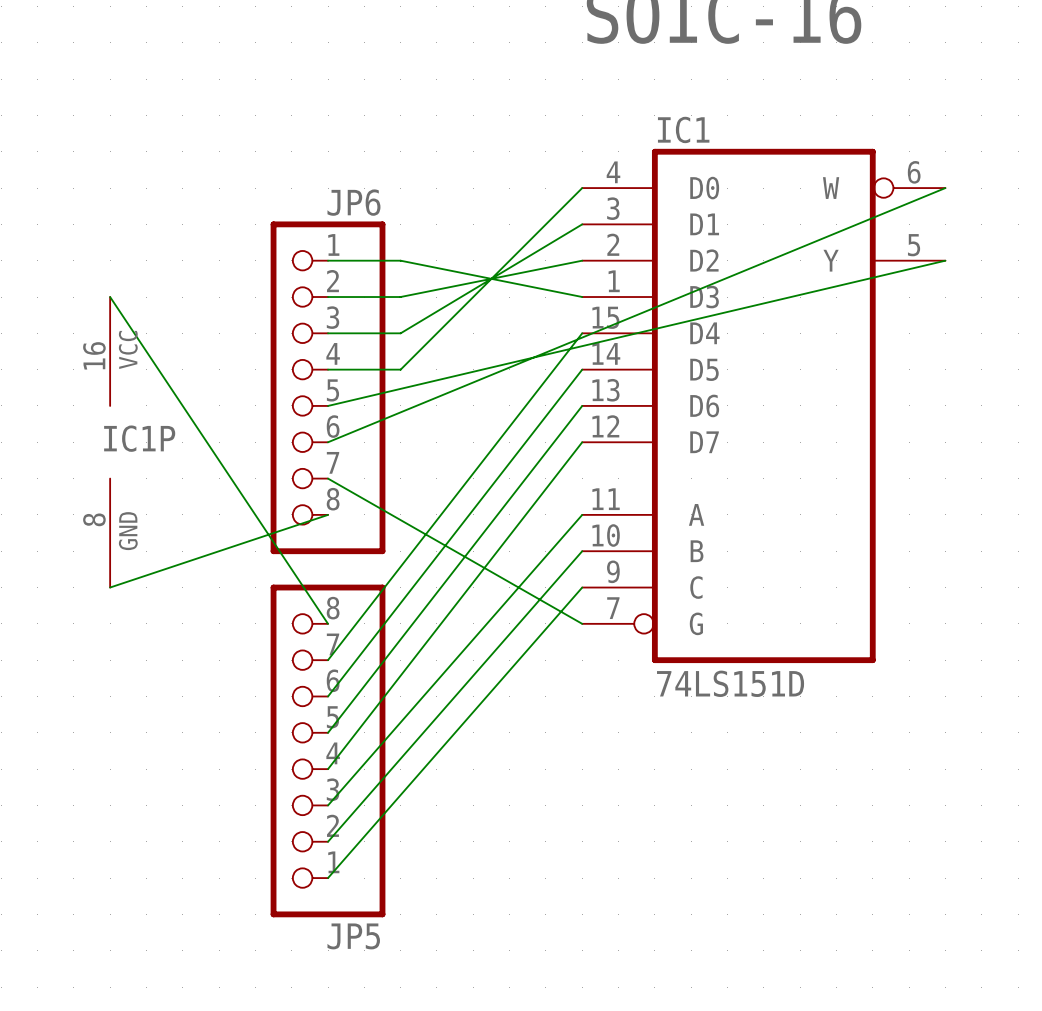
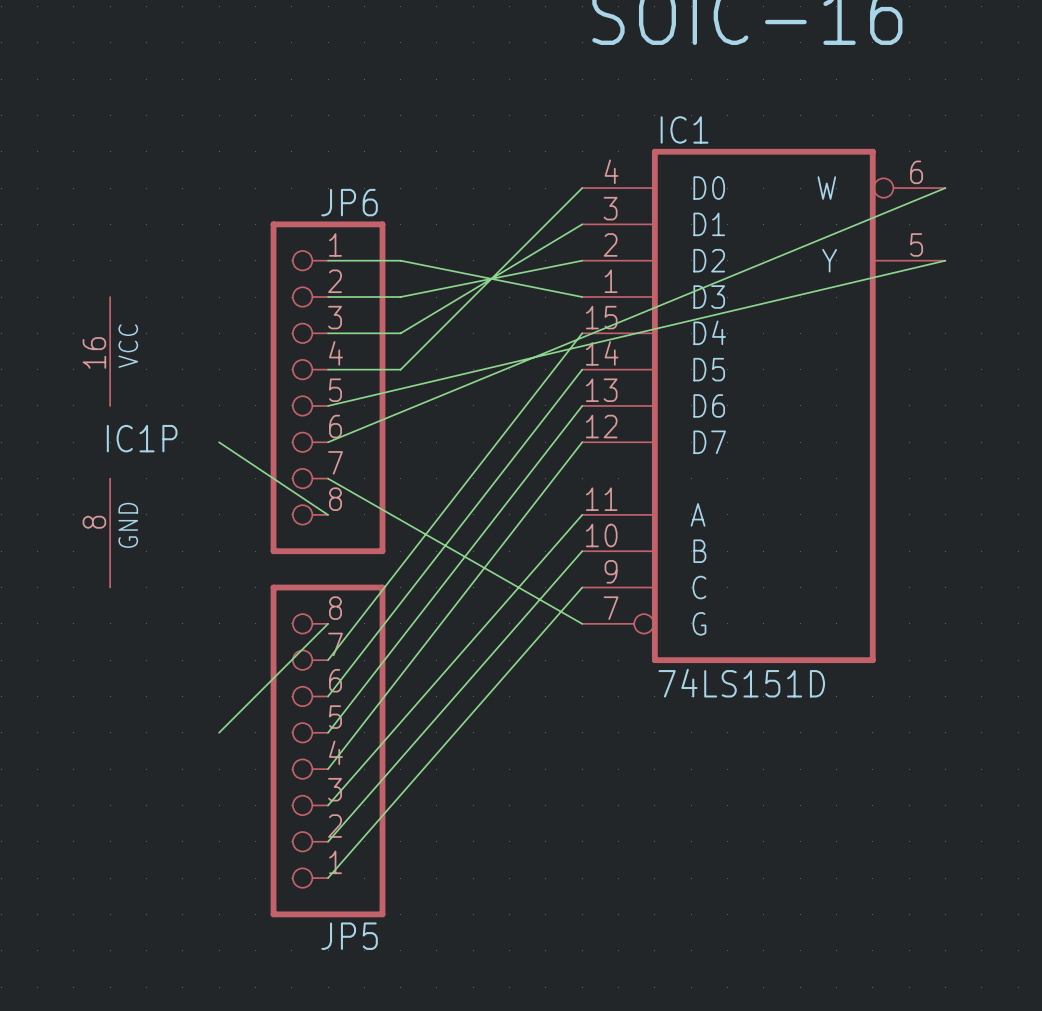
wire: (110, 297) (328, 623) -> (219, 732) (328, 623)
wire: (328, 514) (110, 587) -> (328, 514) (219, 442)

